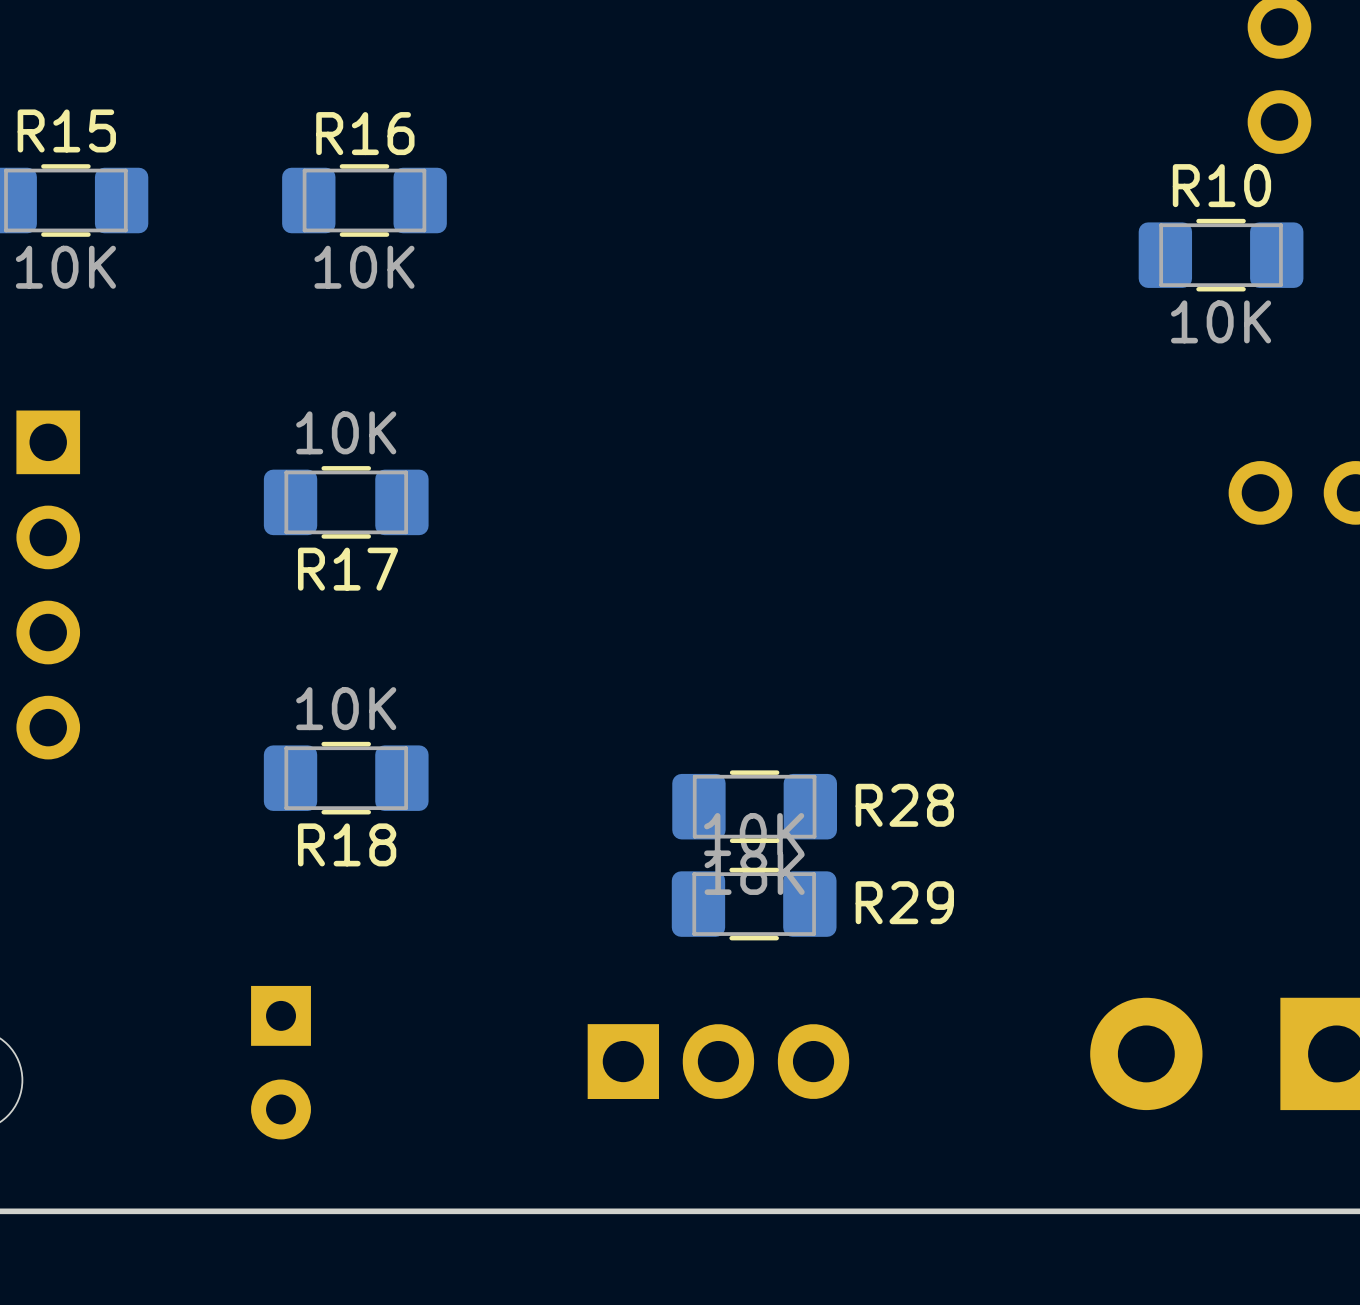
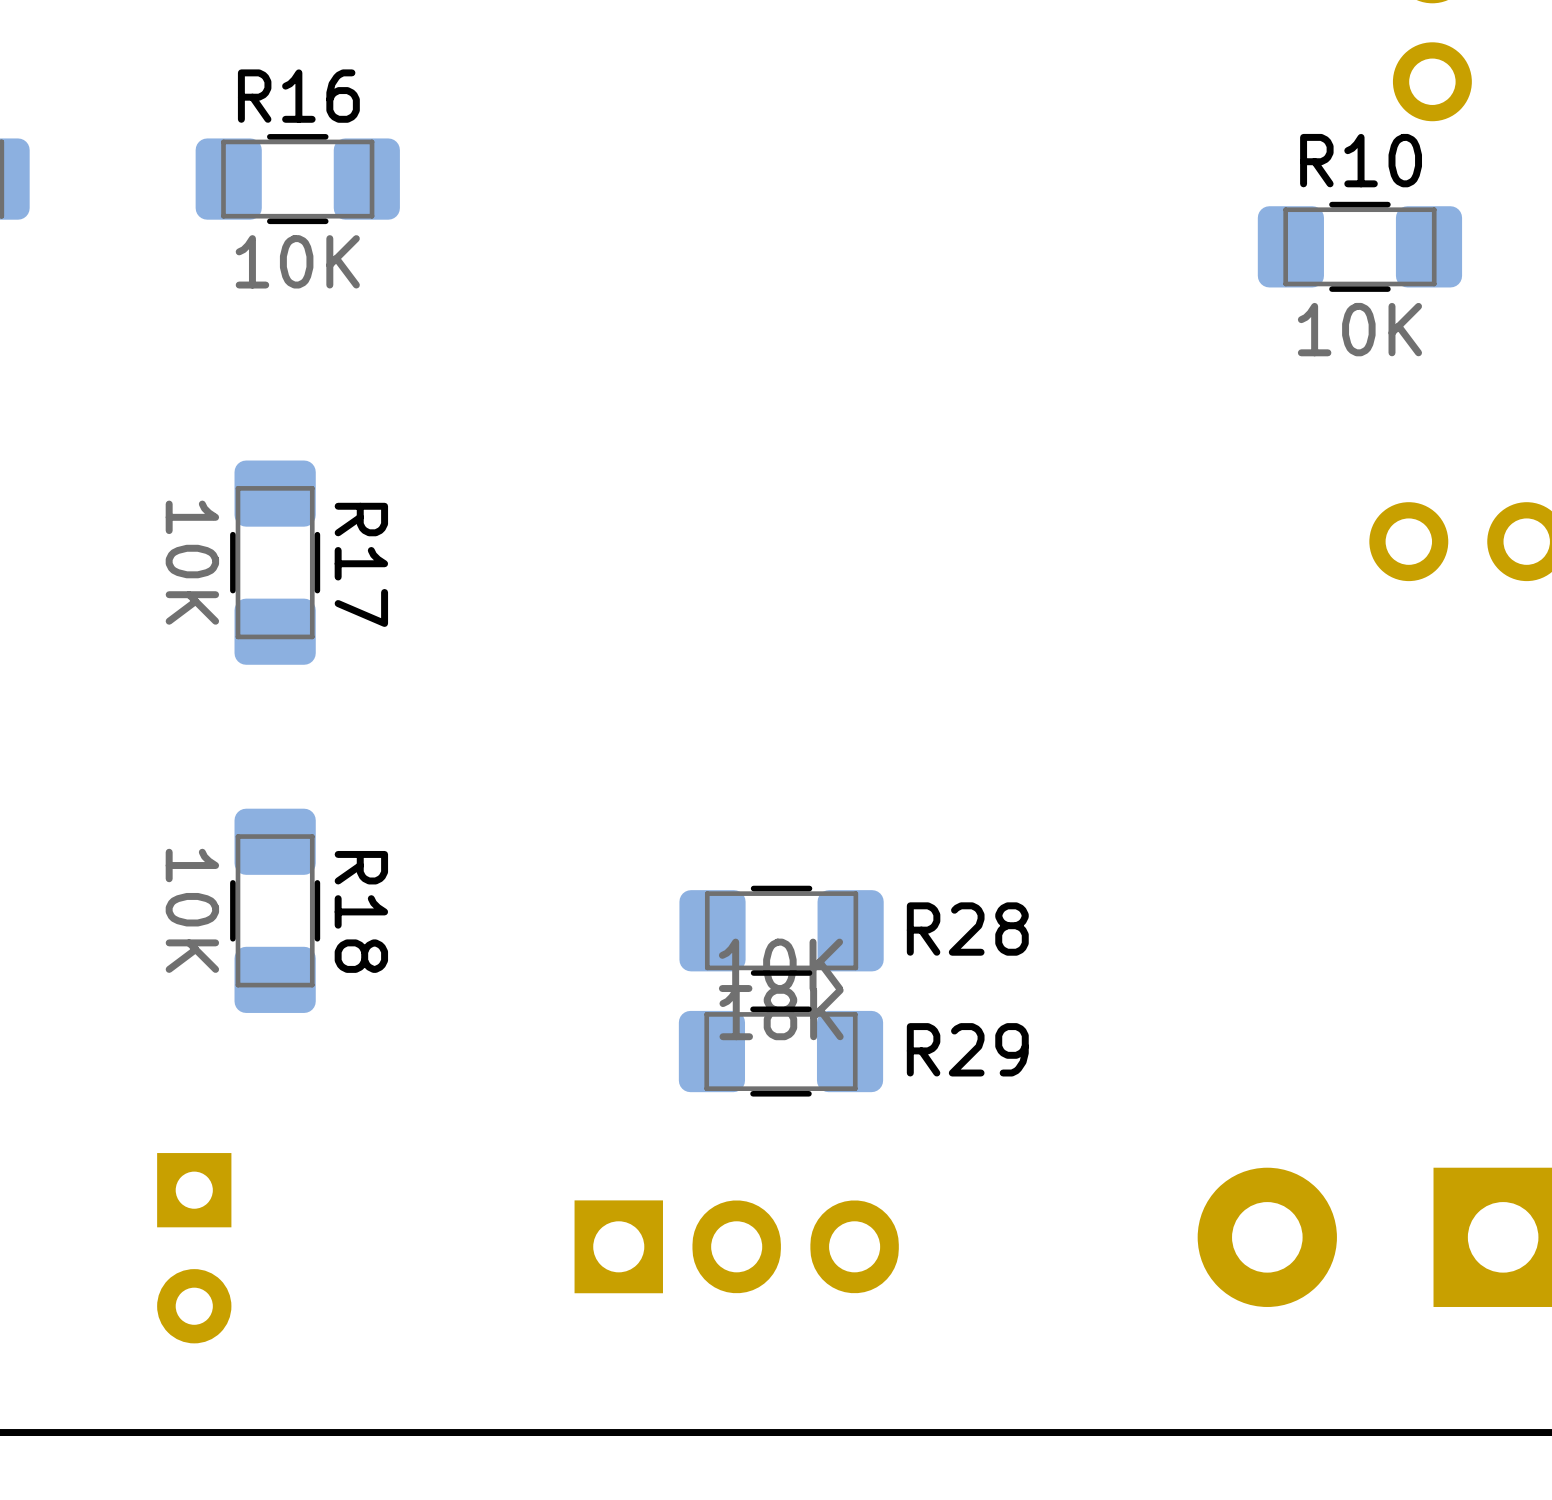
R17 value position: 10K (346, 432) -> 10K (192, 562)
R17 rotation: 0° (346, 502) -> 90° clockwise (275, 562)
R17 name position: R17 (348, 569) -> R17 (361, 564)
R18 value position: 10K (346, 708) -> 10K (192, 910)
R18 rotation: 0° (346, 778) -> 90° clockwise (275, 910)
R18 name position: R18 (347, 844) -> R18 (361, 911)

